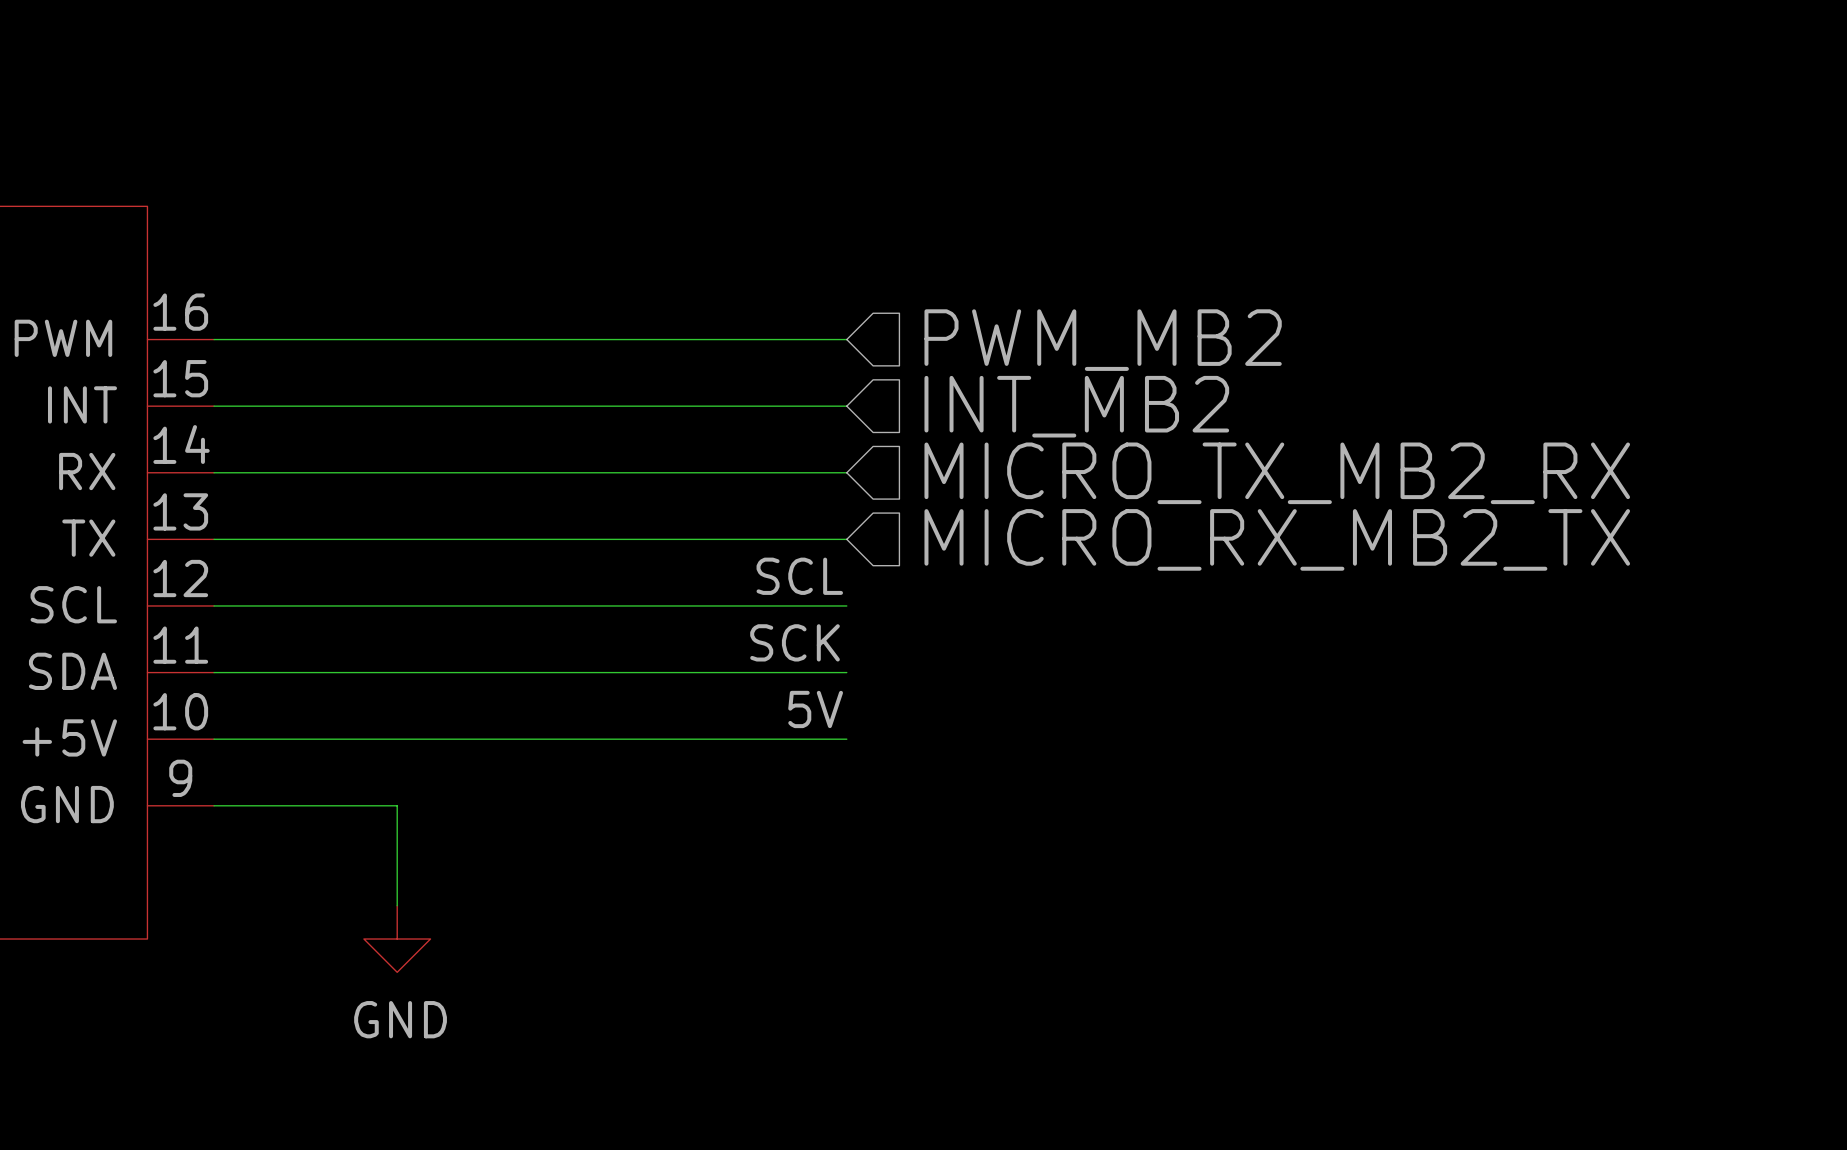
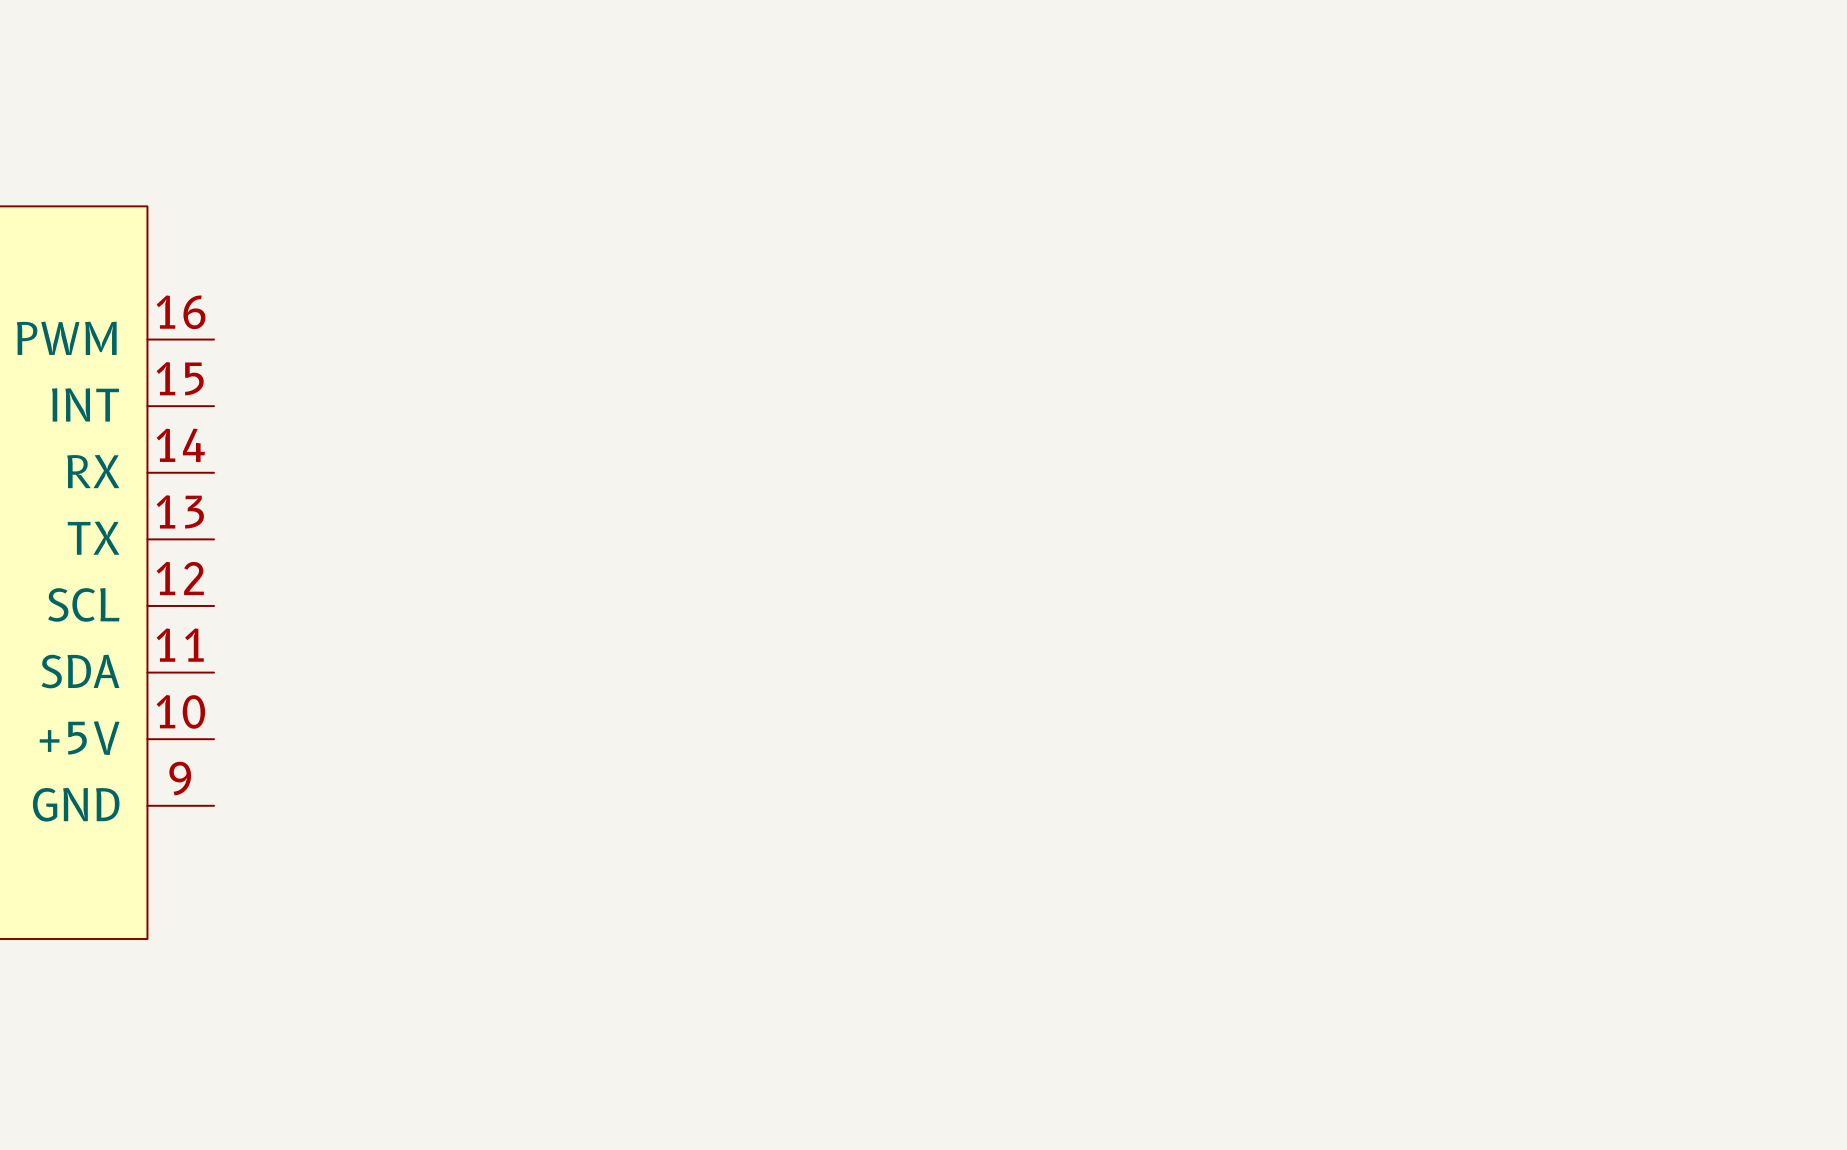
wire: (214, 339) (846, 339) -> none
hierarchical label: PWM_MB2 (1103, 340) -> none
wire: (214, 406) (846, 406) -> none
hierarchical label: INT_MB2 (1076, 406) -> none
wire: (214, 472) (846, 472) -> none
hierarchical label: MICRO_TX_MB2_RX (1277, 473) -> none
wire: (214, 539) (846, 539) -> none
hierarchical label: MICRO_RX_MB2_TX (1277, 539) -> none
label: SCL (799, 576) -> none
wire: (214, 605) (846, 605) -> none
label: SCK (795, 642) -> none
wire: (214, 672) (846, 672) -> none
label: 5V (815, 709) -> none
wire: (214, 739) (846, 739) -> none
wire: (214, 805) (397, 805) (397, 905) -> none
power symbol: GND (397, 939) -> none

